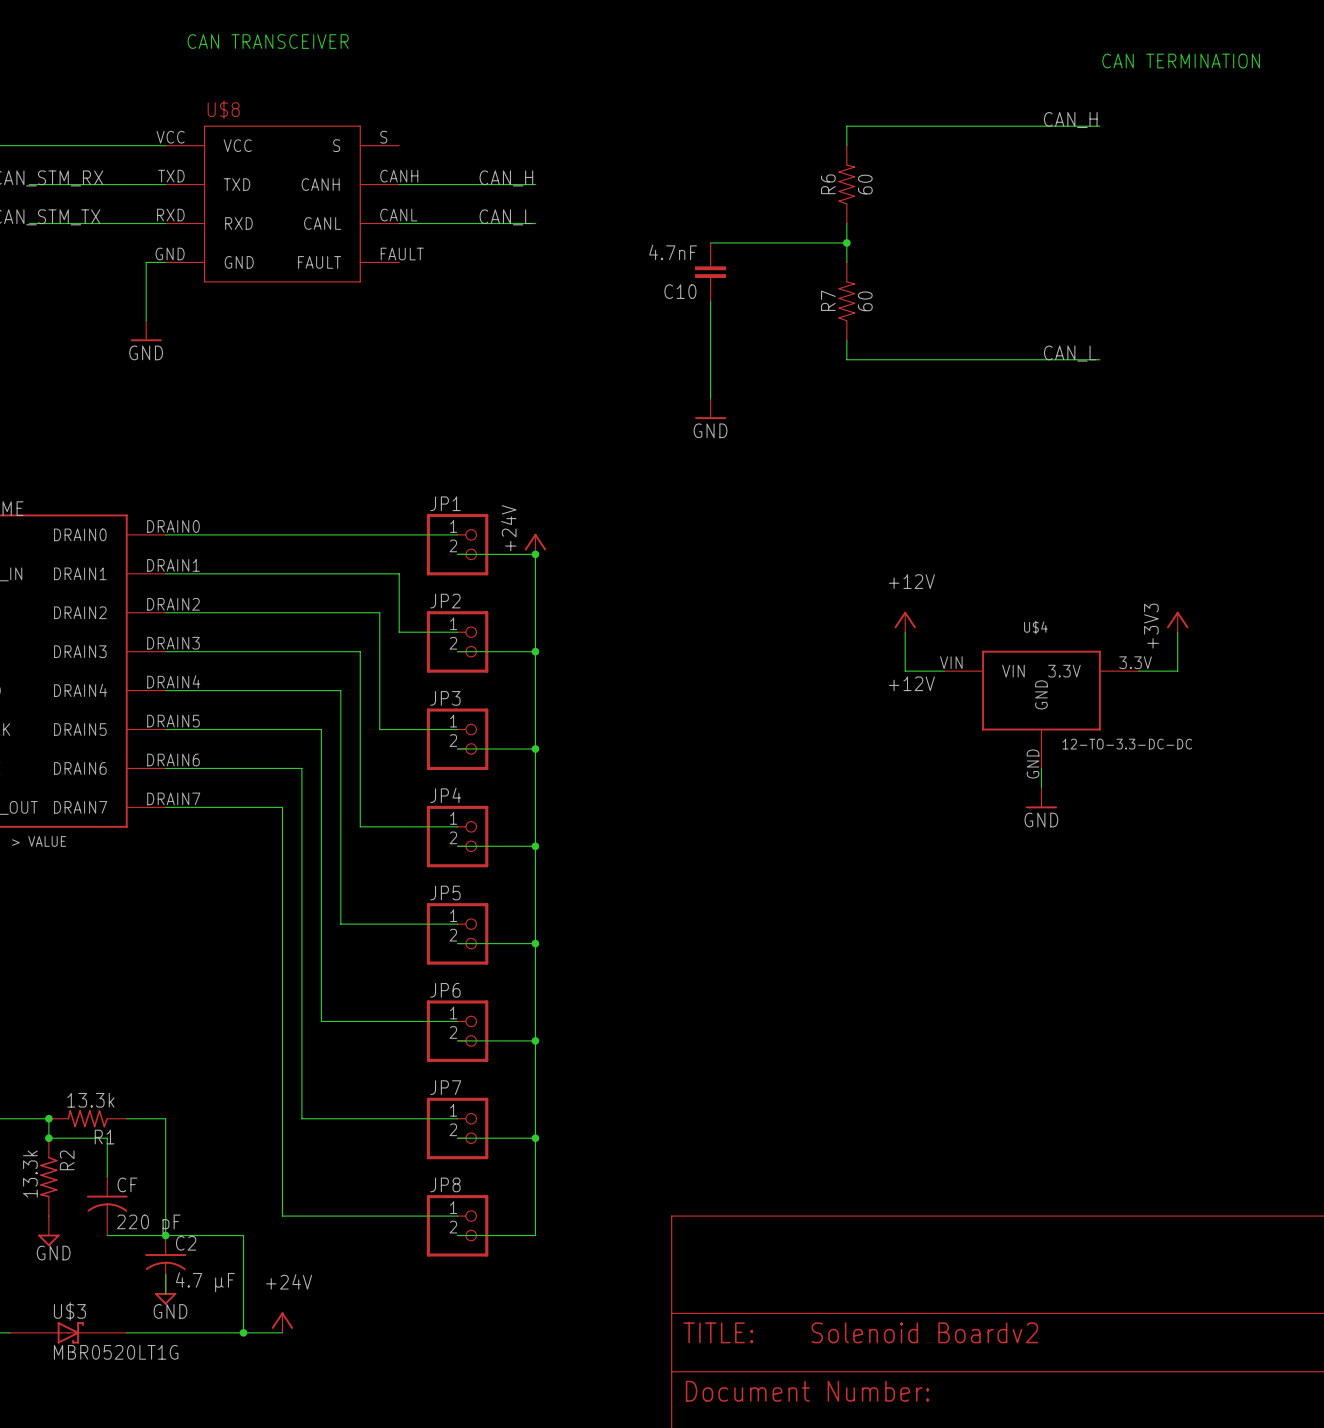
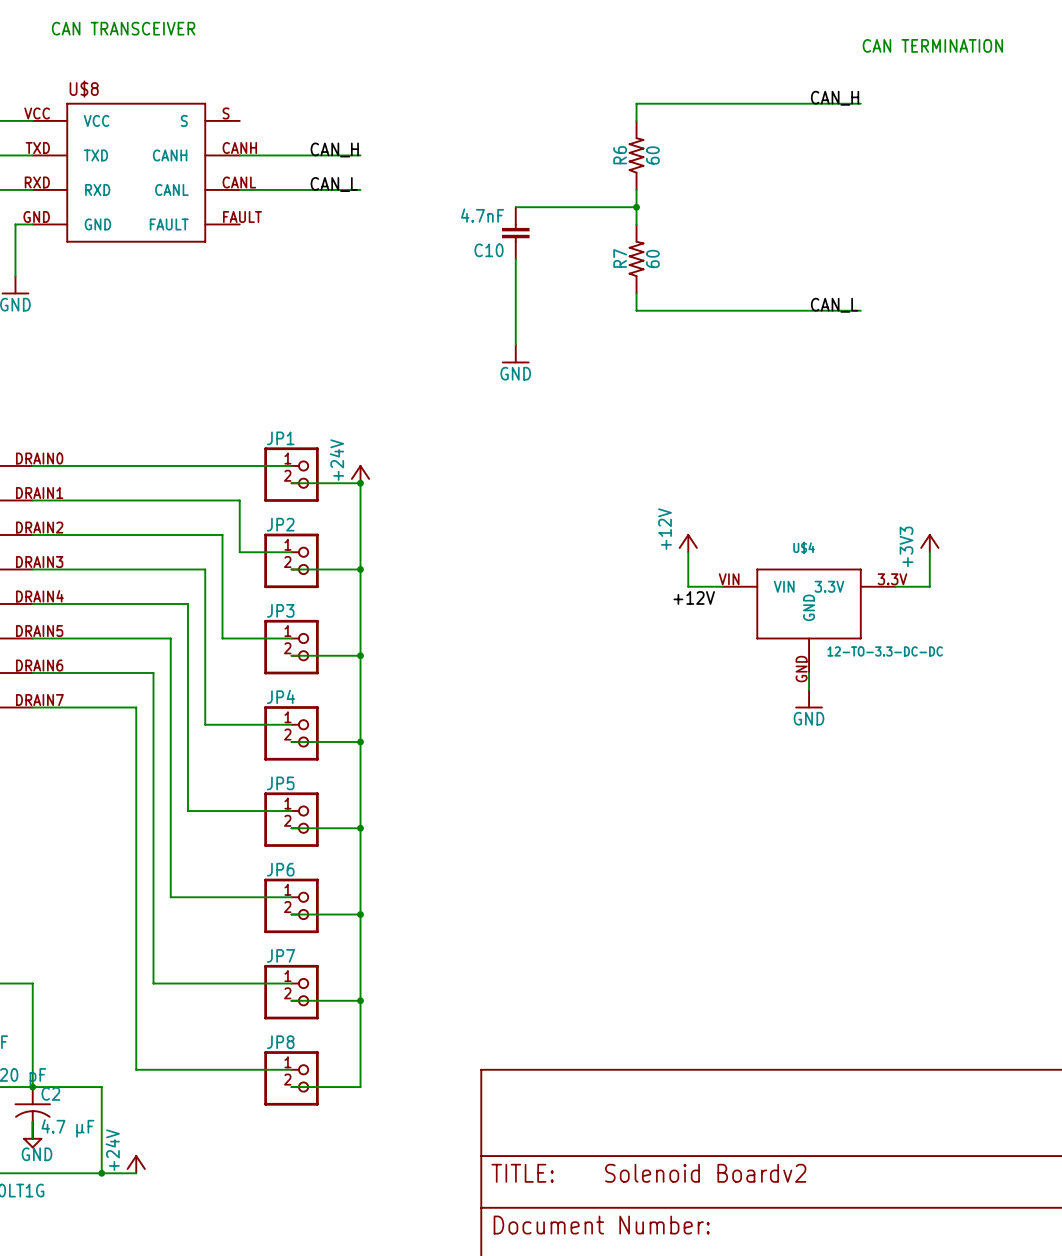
power symbol text rotation: 0° (911, 581) -> 90° counterclockwise (665, 529)
power symbol text rotation: 0° (289, 1281) -> 90° counterclockwise (112, 1150)

